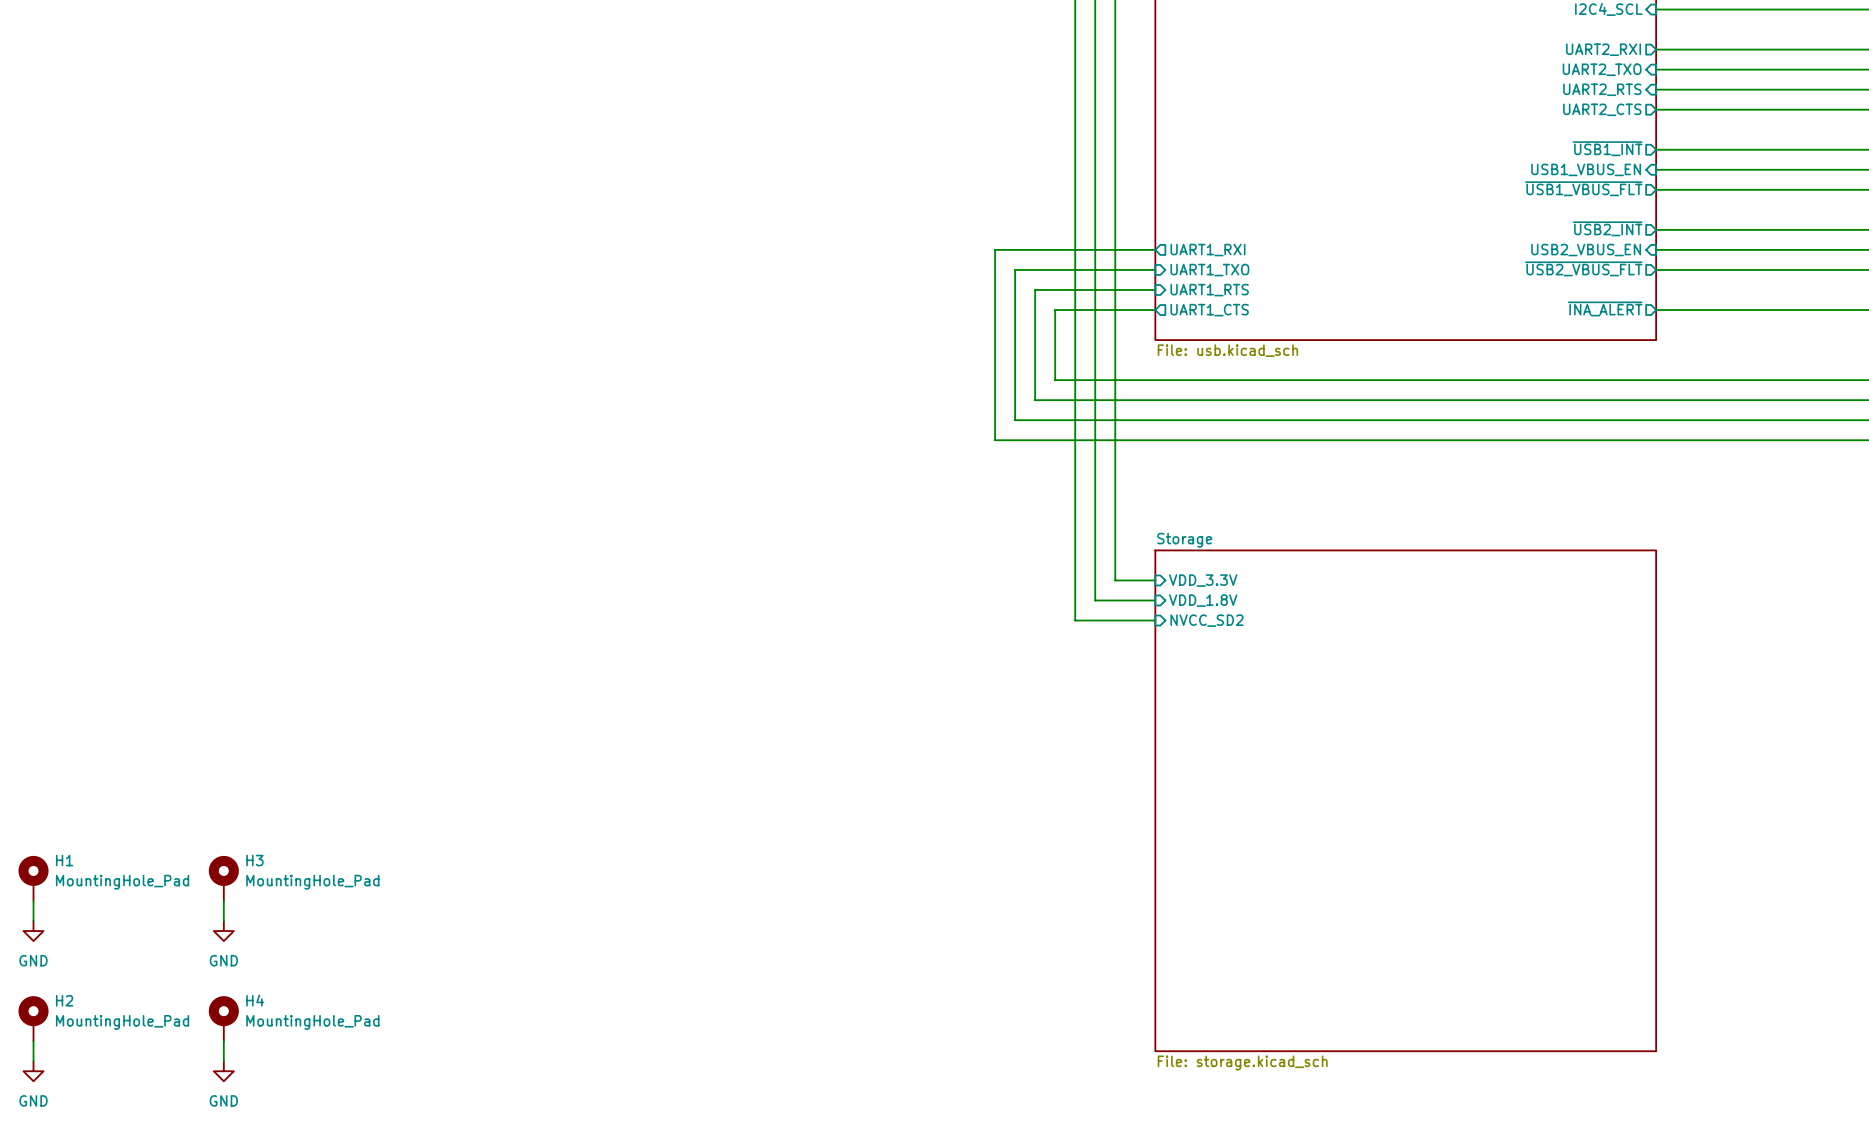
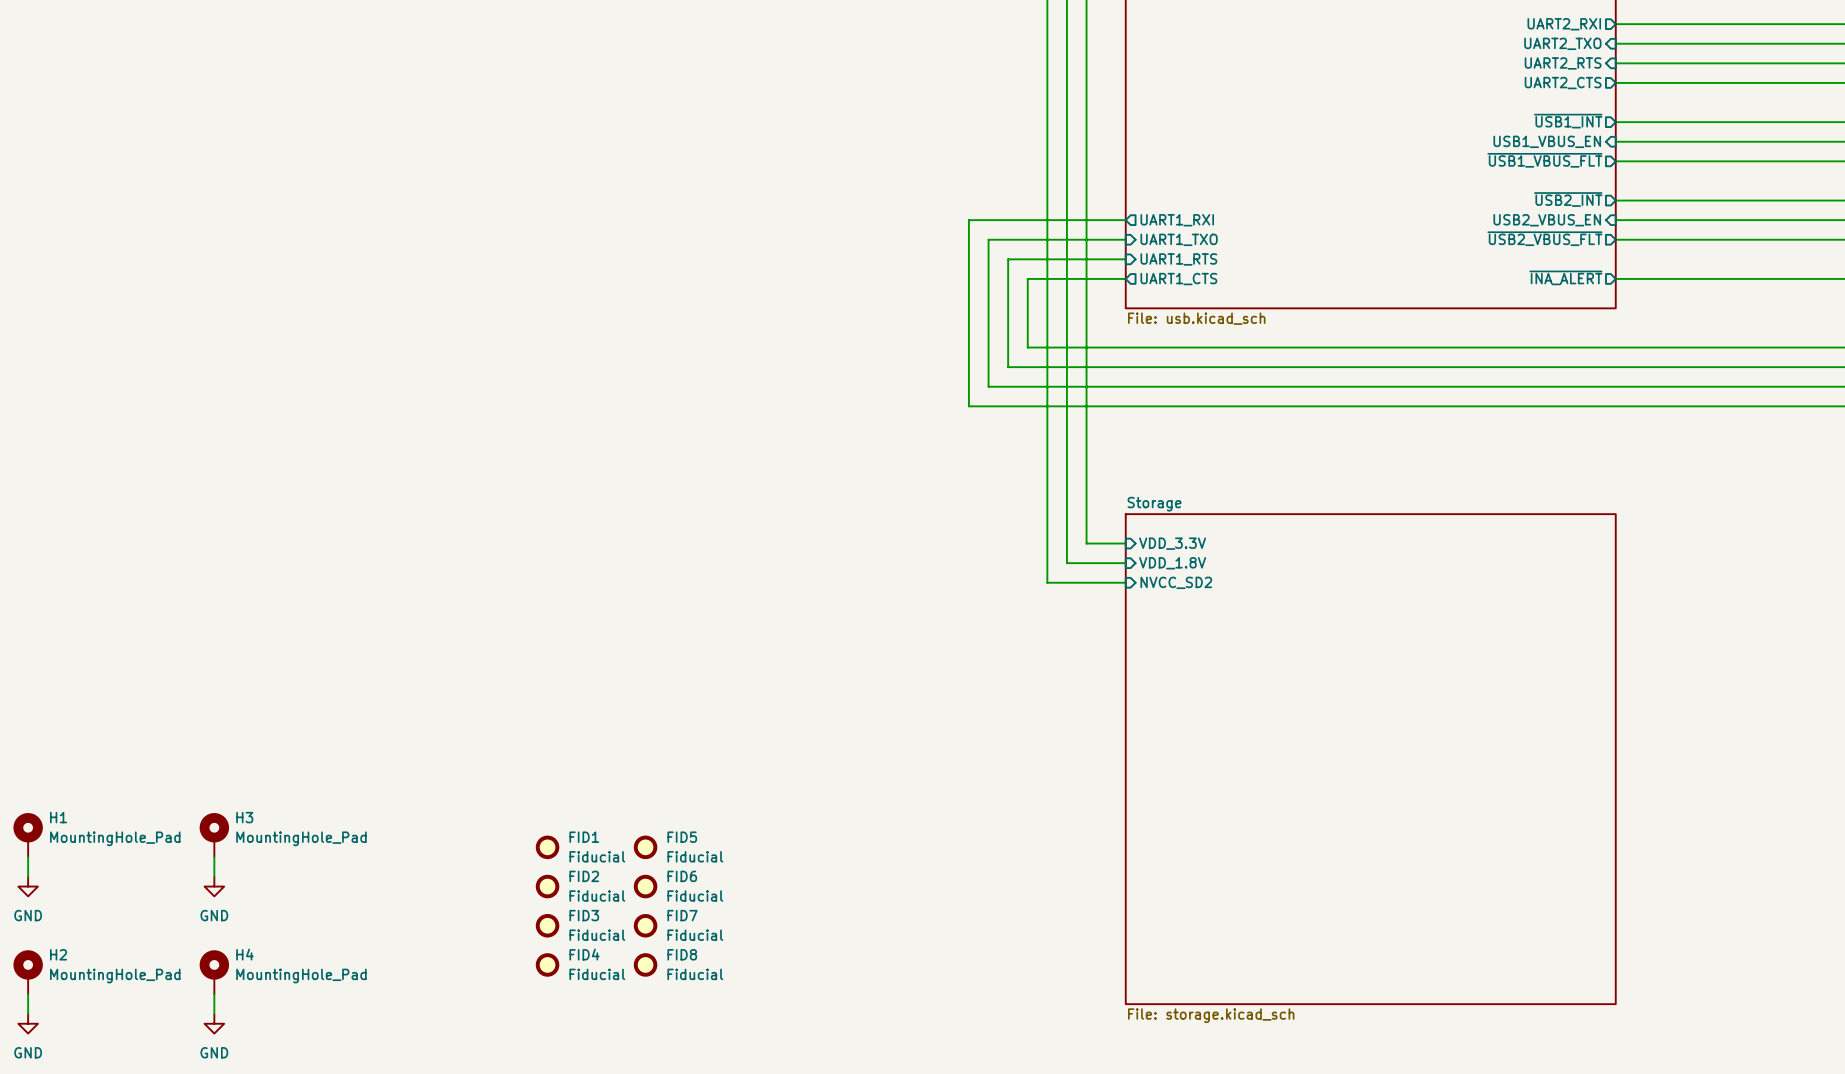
FID1: none -> Fiducial (547, 847)
FID5: none -> Fiducial (645, 847)
FID2: none -> Fiducial (547, 886)
FID6: none -> Fiducial (645, 886)
FID3: none -> Fiducial (547, 925)
FID7: none -> Fiducial (645, 925)
FID4: none -> Fiducial (547, 964)
FID8: none -> Fiducial (645, 964)

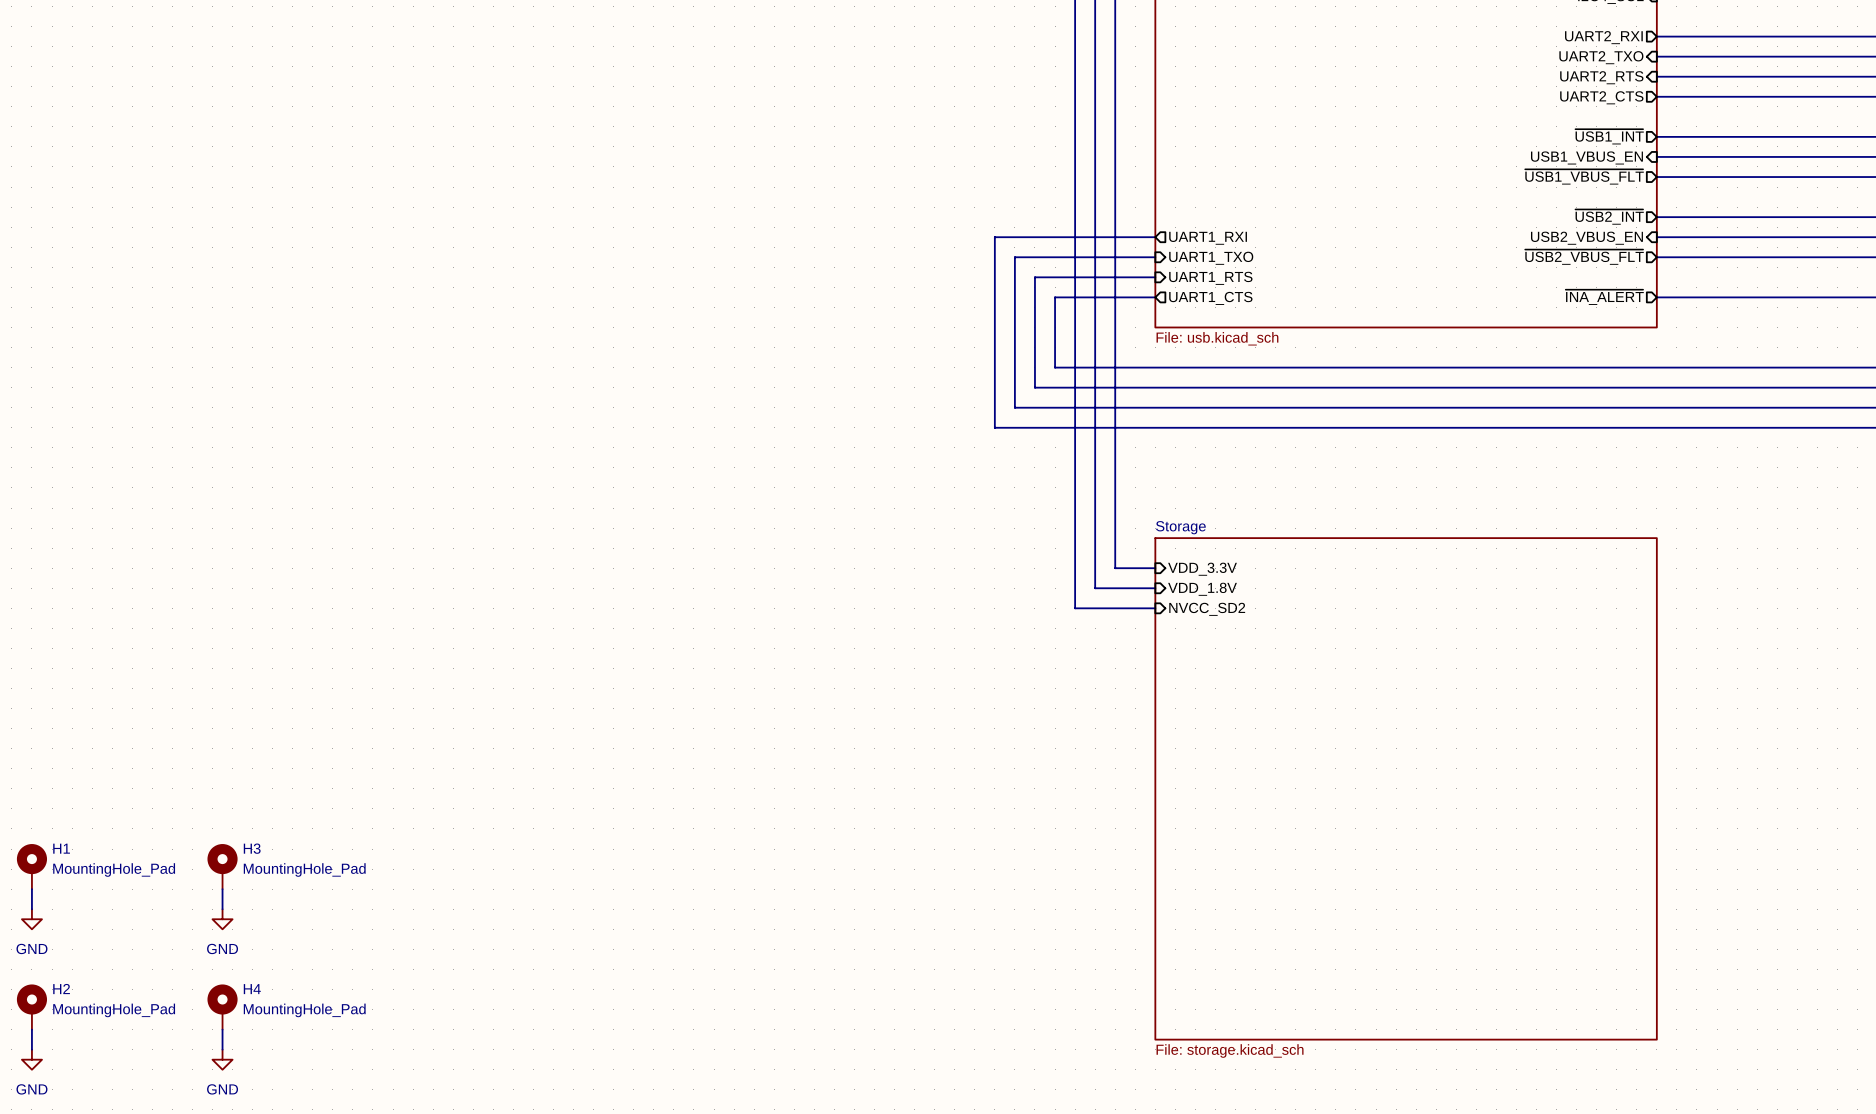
FID1: Fiducial (547, 847) -> none
FID5: Fiducial (645, 847) -> none
FID2: Fiducial (547, 886) -> none
FID6: Fiducial (645, 886) -> none
FID3: Fiducial (547, 925) -> none
FID7: Fiducial (645, 925) -> none
FID4: Fiducial (547, 964) -> none
FID8: Fiducial (645, 964) -> none

